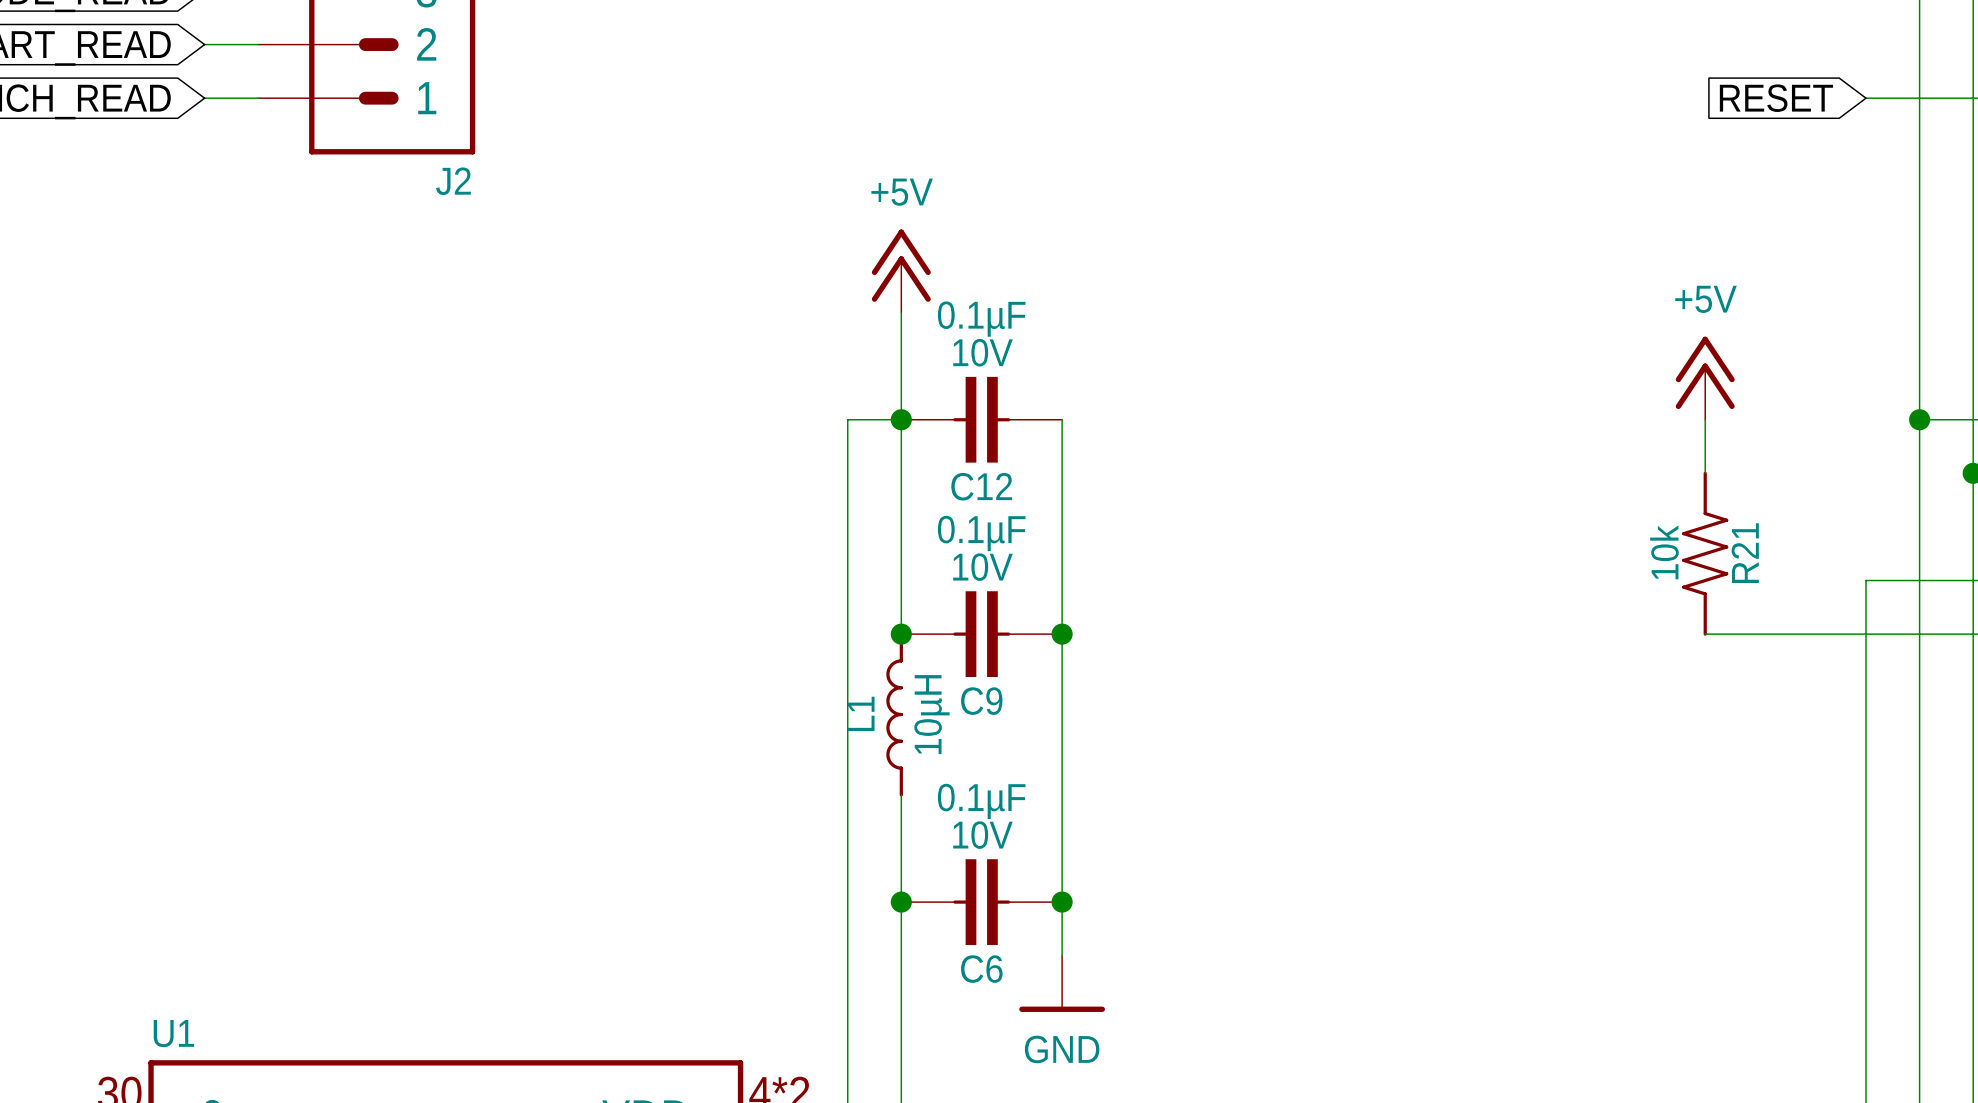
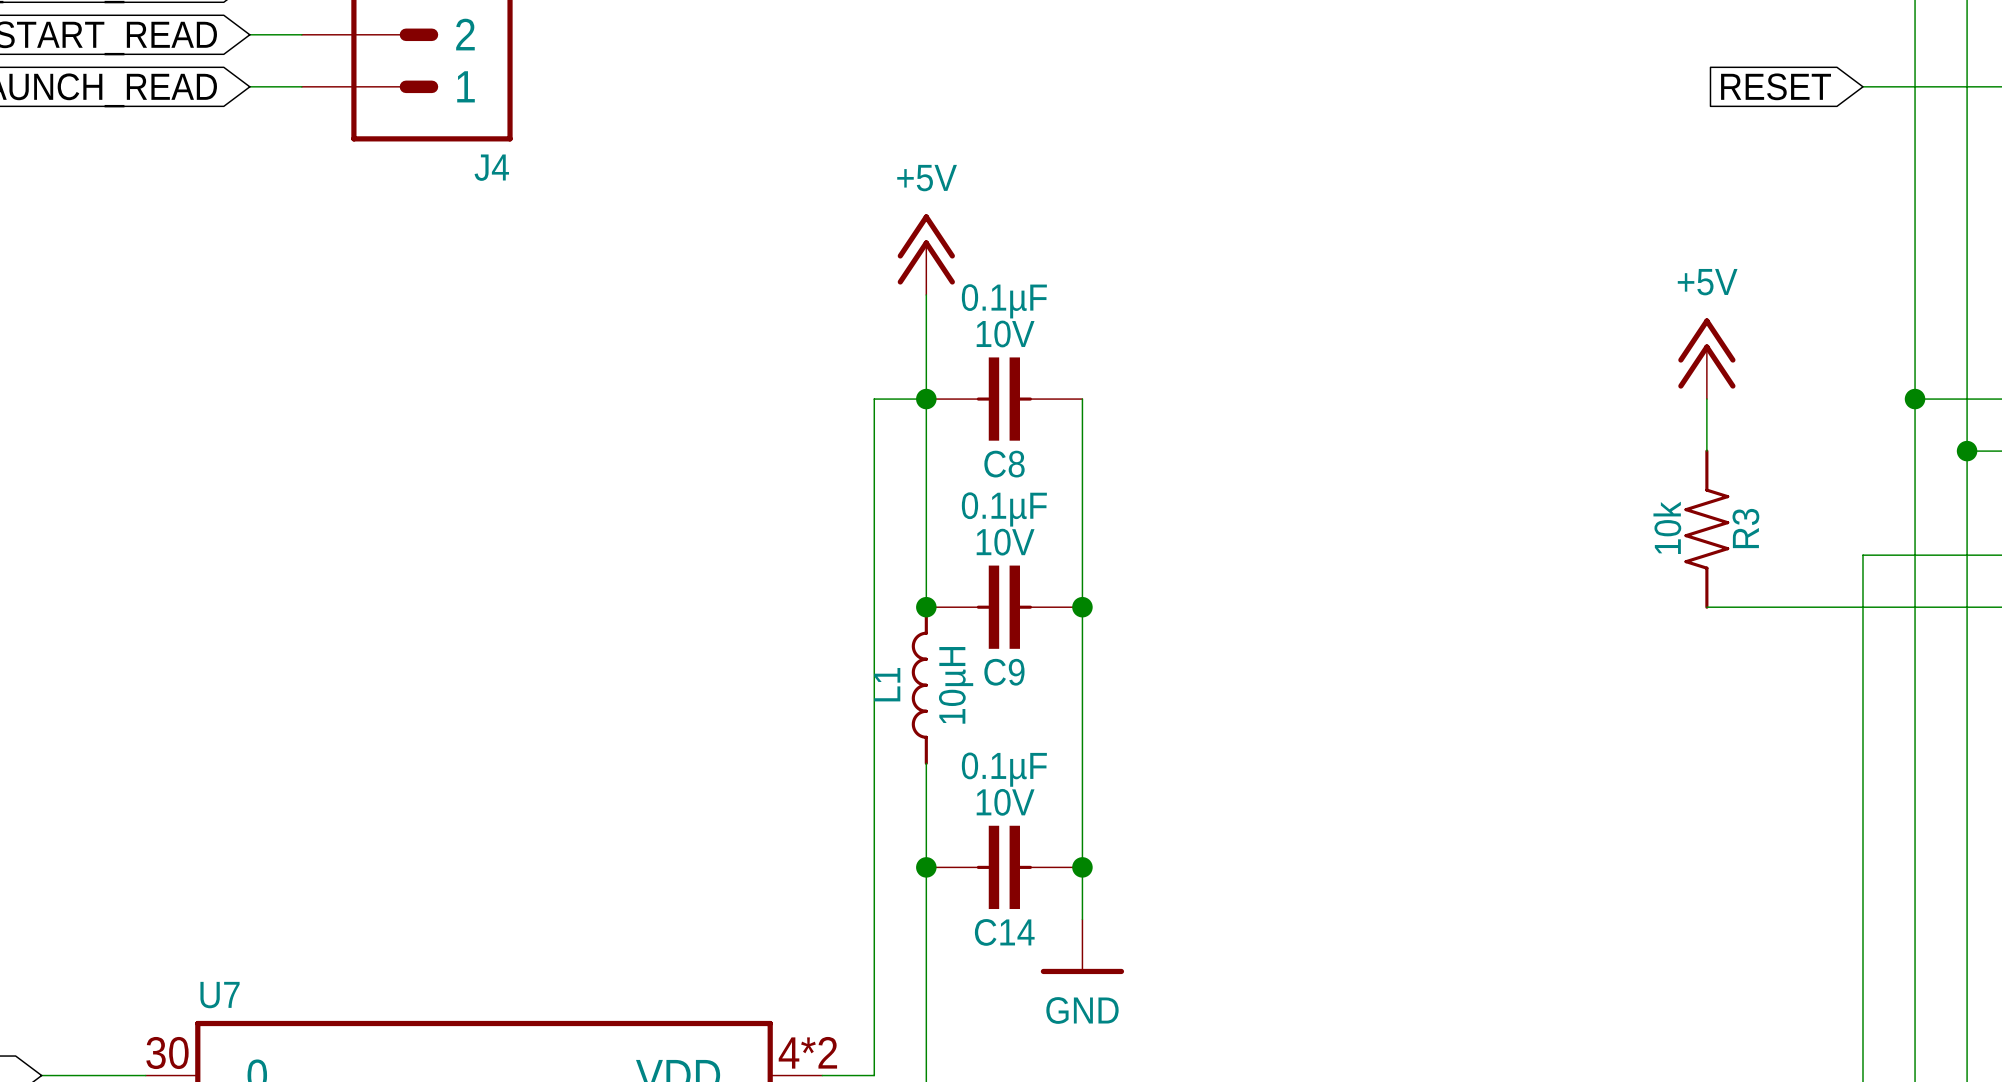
J2 name: J2 (453, 181) -> J4 (491, 167)
C12 name: C12 (981, 486) -> C8 (1004, 464)
R21 name: R21 (1745, 553) -> R3 (1745, 528)
C6 name: C6 (981, 969) -> C14 (1004, 932)
U1 name: U1 (173, 1033) -> U7 (220, 995)

